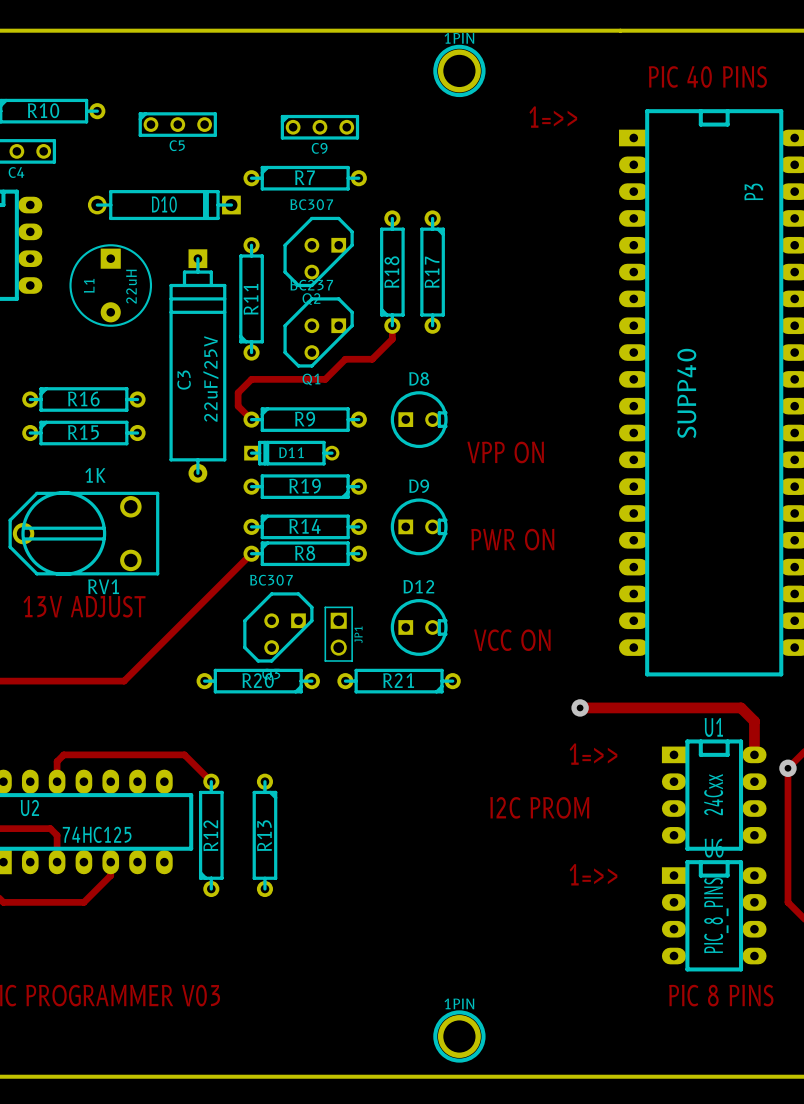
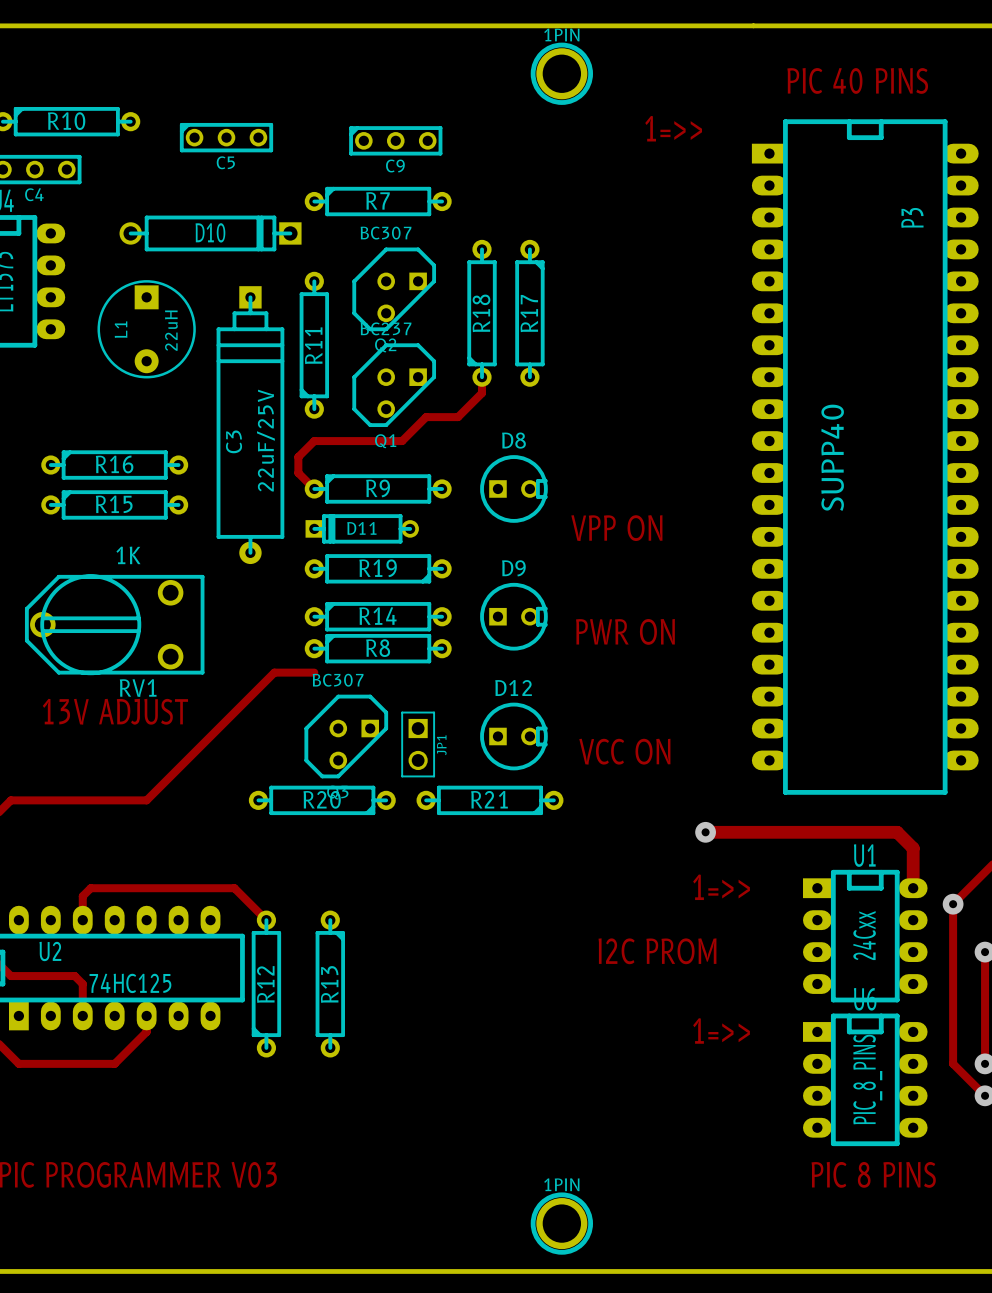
track: (251, 553) (124, 681) (110, 681) -> (314, 672) (274, 672) (146, 800)

